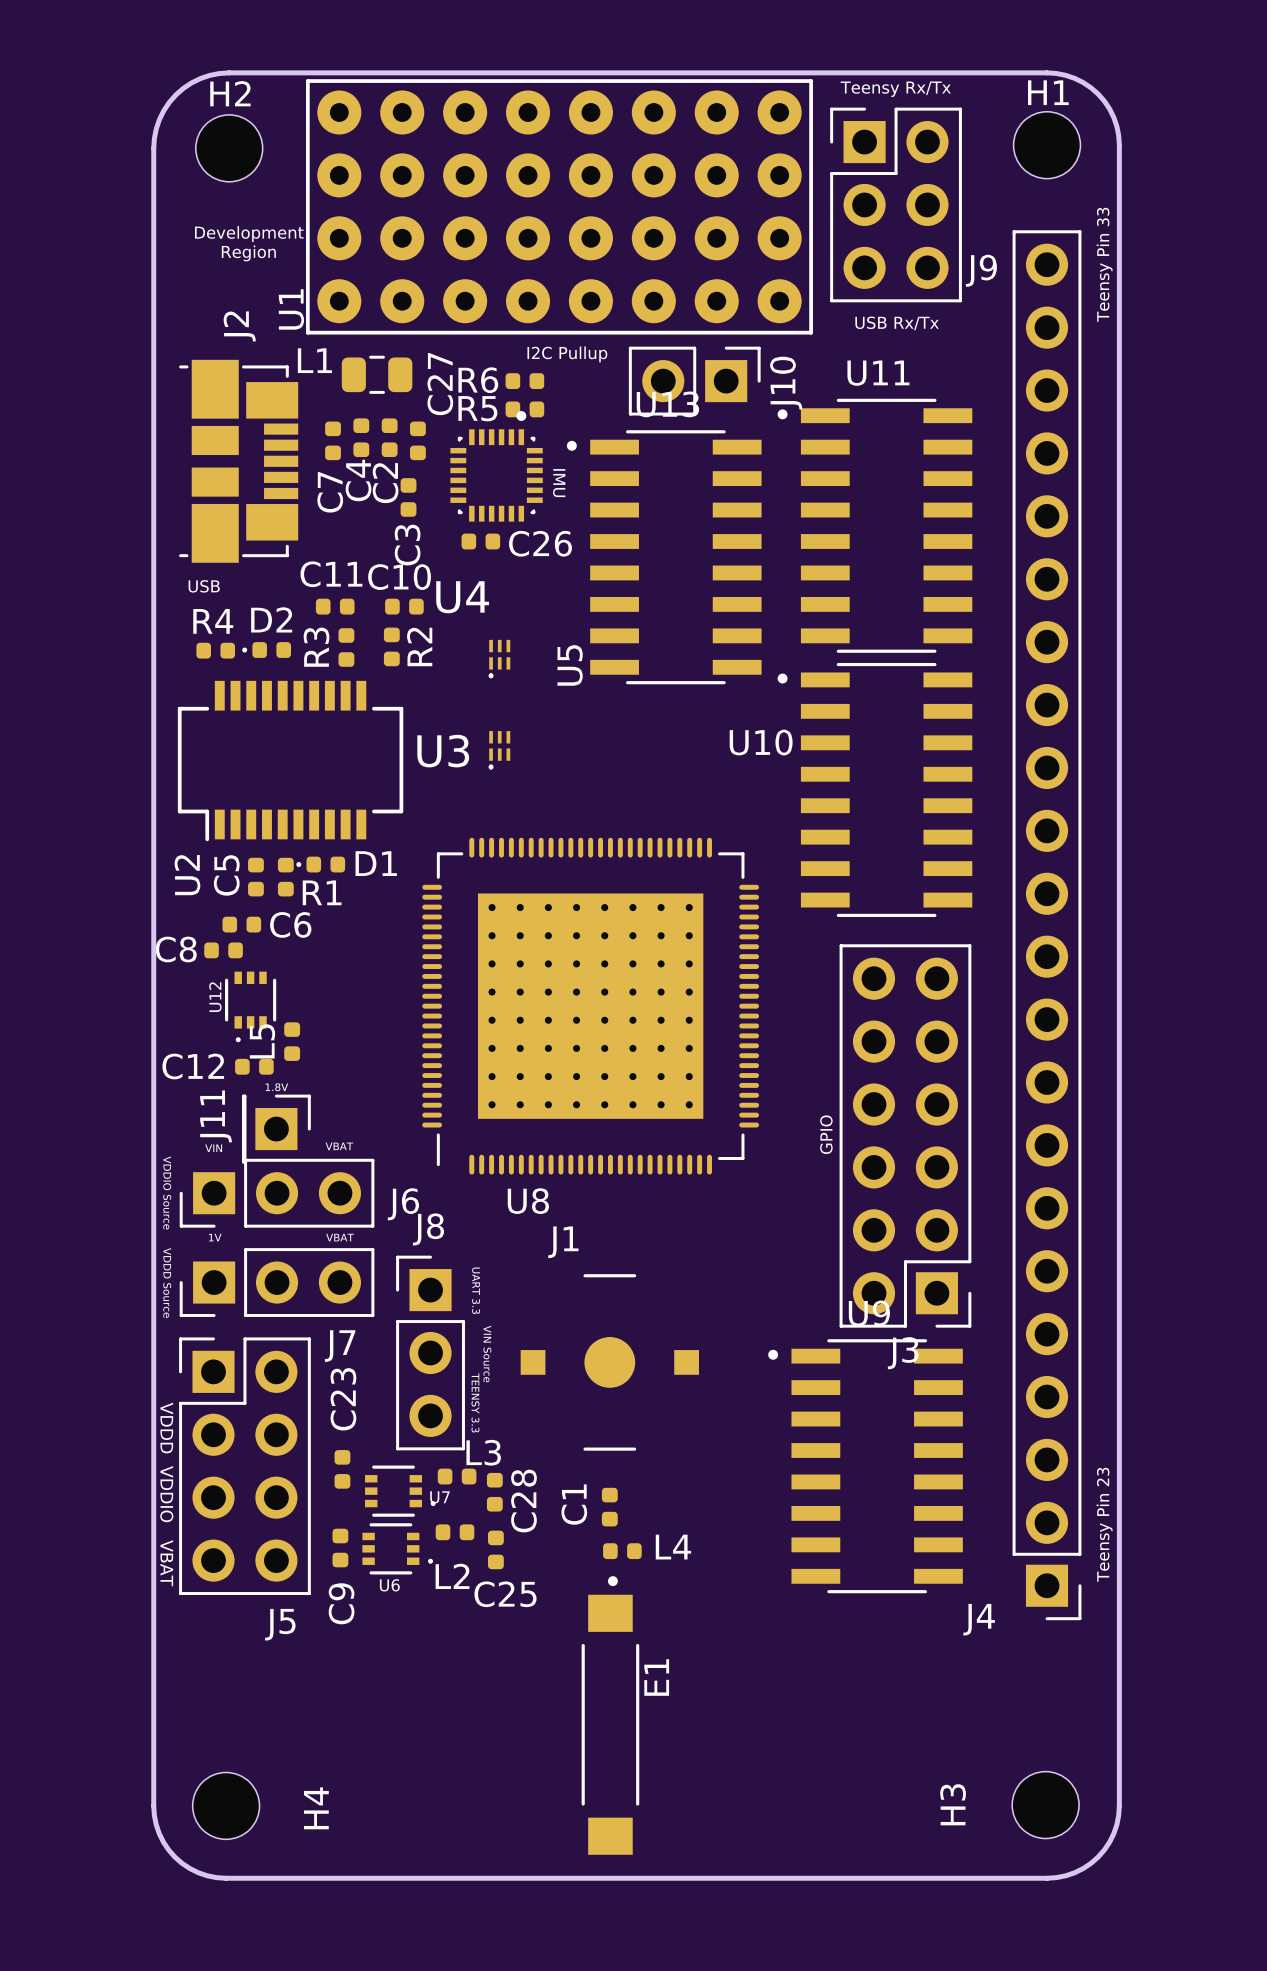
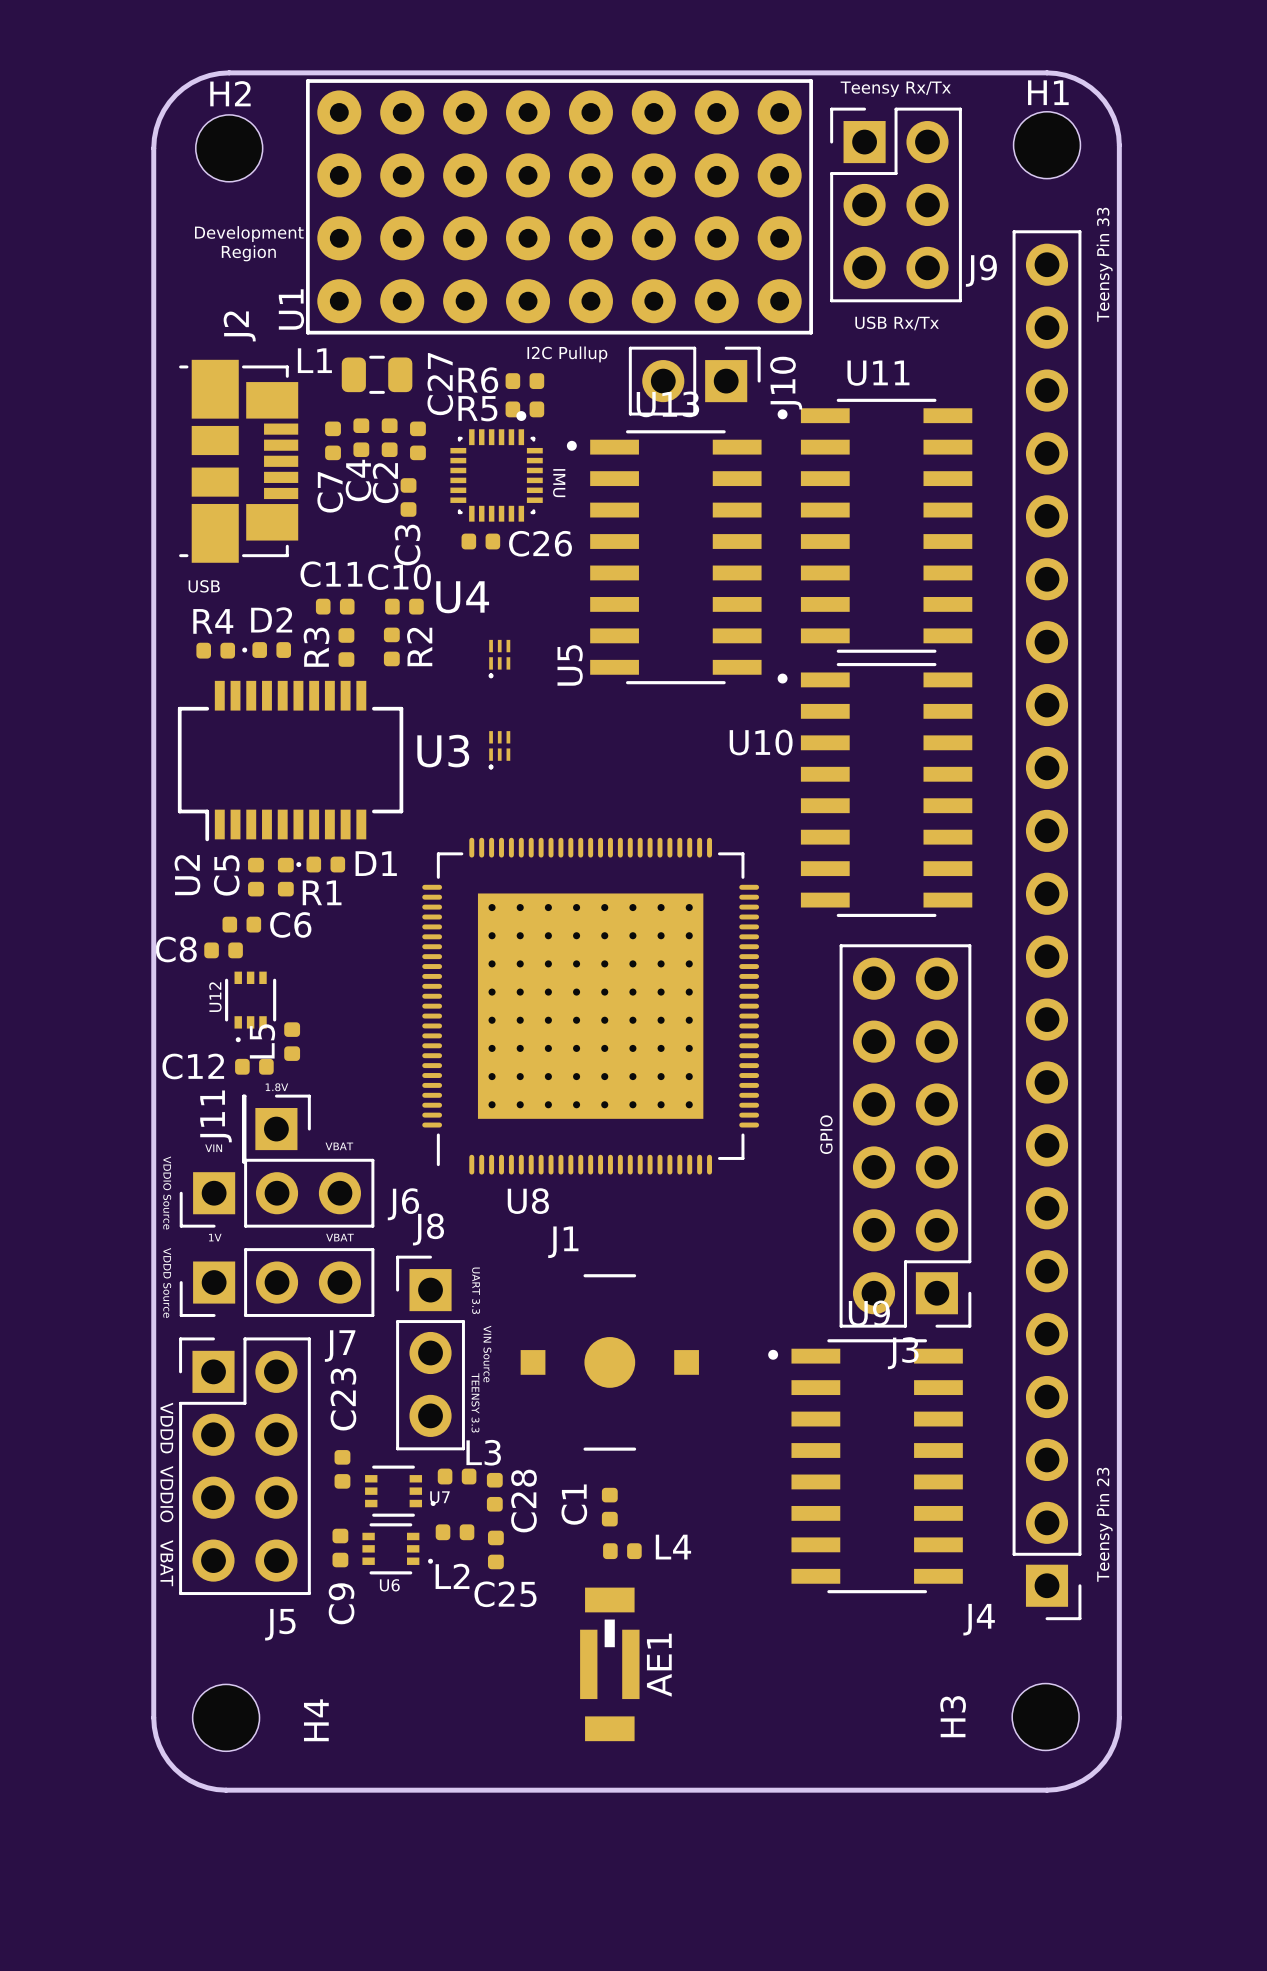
AE1: none -> (609, 1664)
E1: (610, 1715) -> none
board edge: (153, 1717) (153, 1805) (159, 1833) (174, 1857) (189, 1868) (207, 1875) (226, 1878) (1056, 1877) (1074, 1872) (1091, 1863) (1104, 1849) (1113, 1833) (1119, 1805) (1119, 1717) -> (153, 1717) (159, 1745) (174, 1769) (198, 1784) (226, 1790) (1056, 1789) (1074, 1784) (1098, 1769) (1113, 1745) (1119, 1717)
H4 position: (226, 1805) -> (226, 1717)
H3 position: (1045, 1805) -> (1045, 1717)

